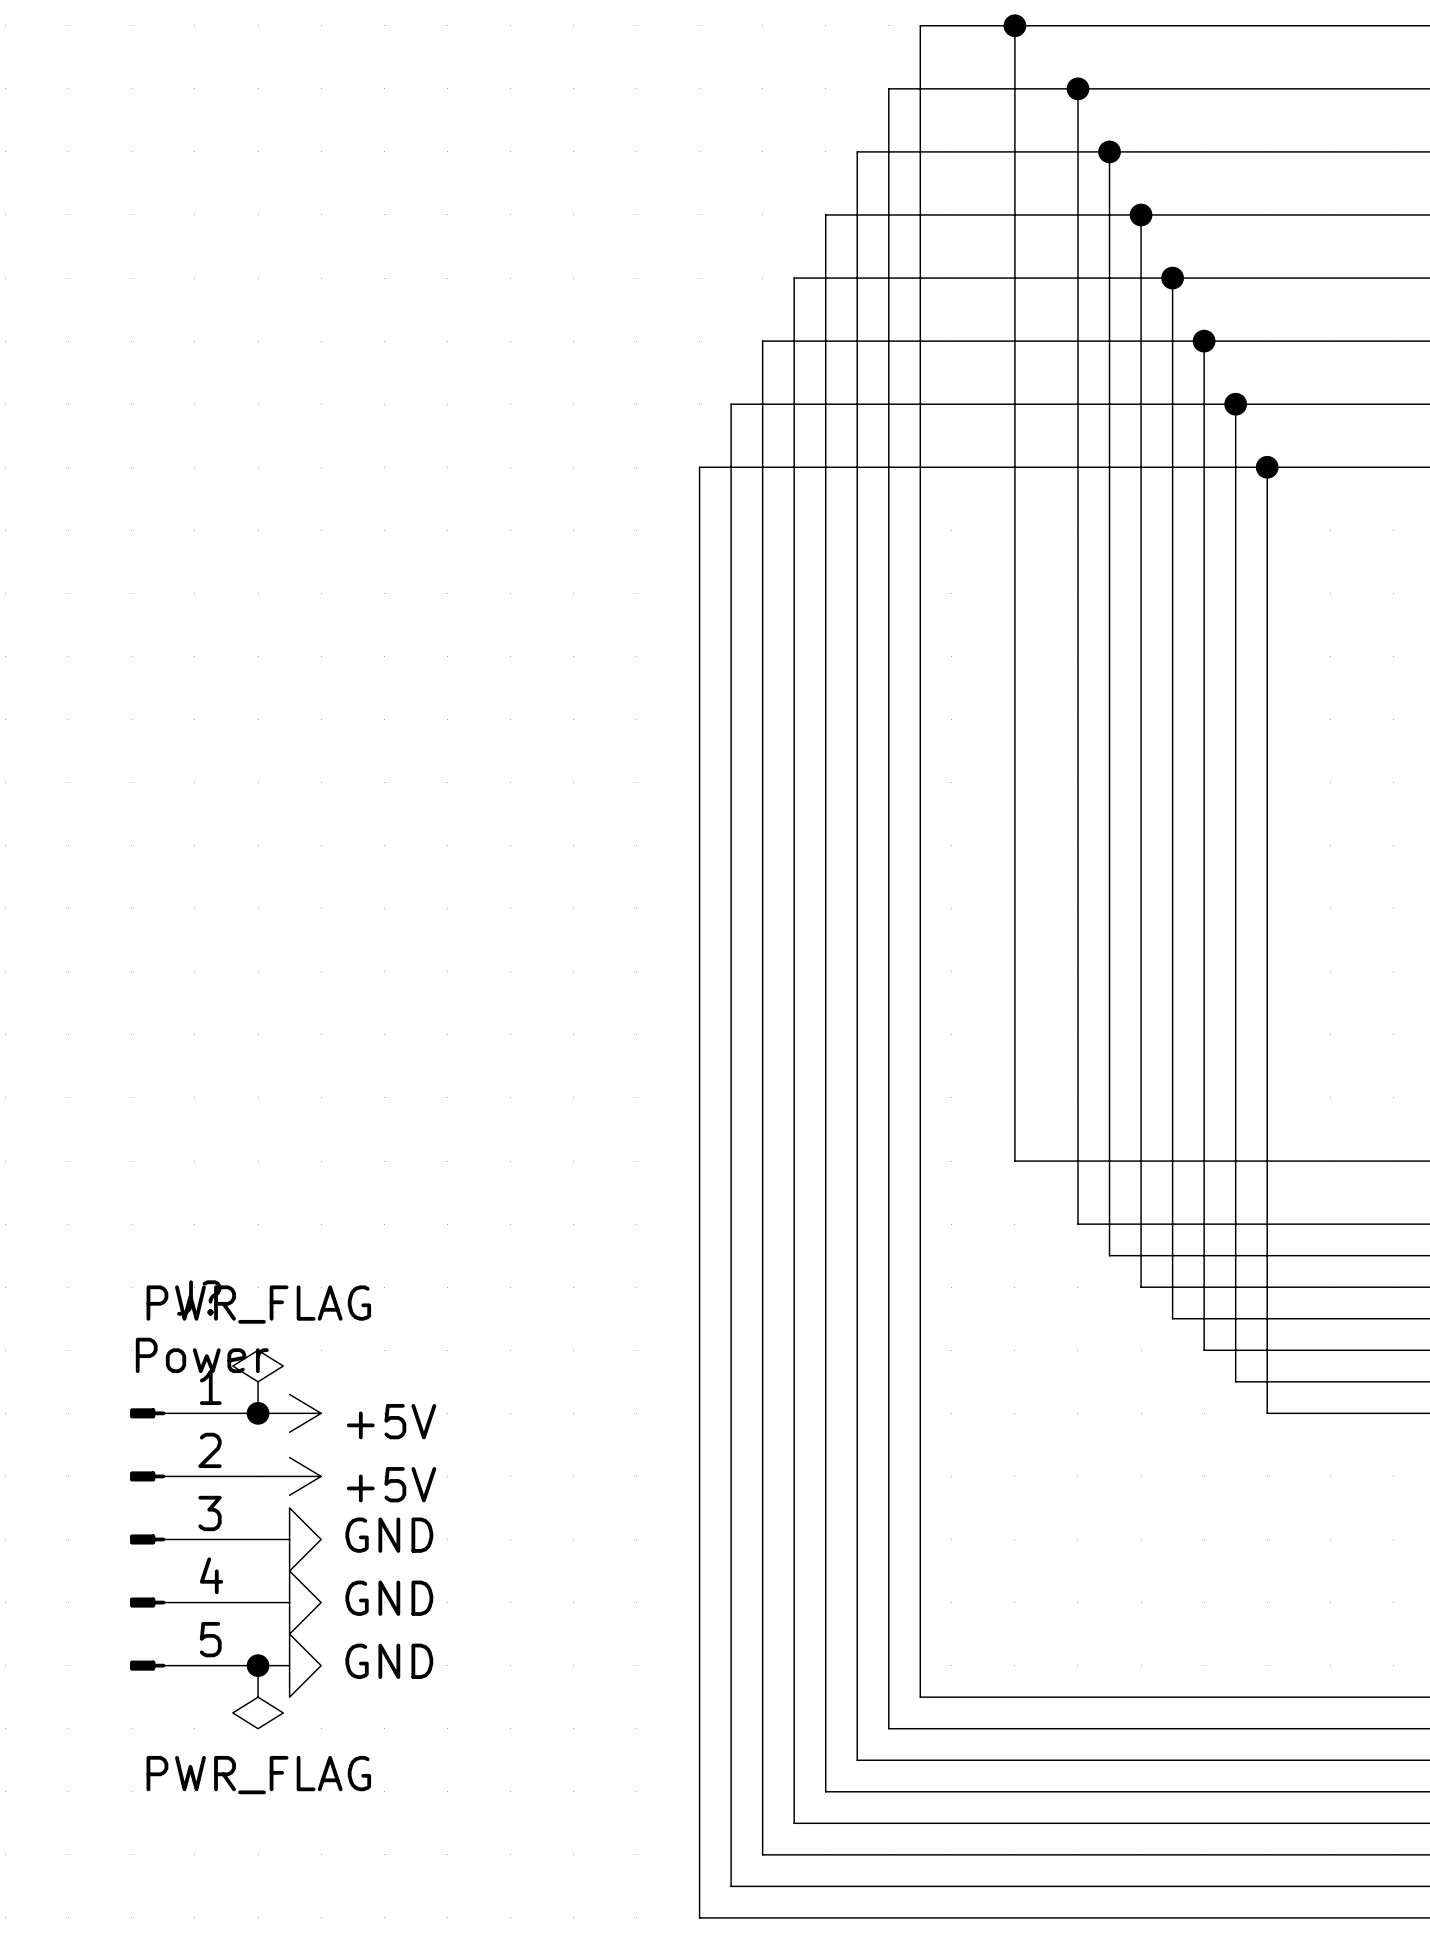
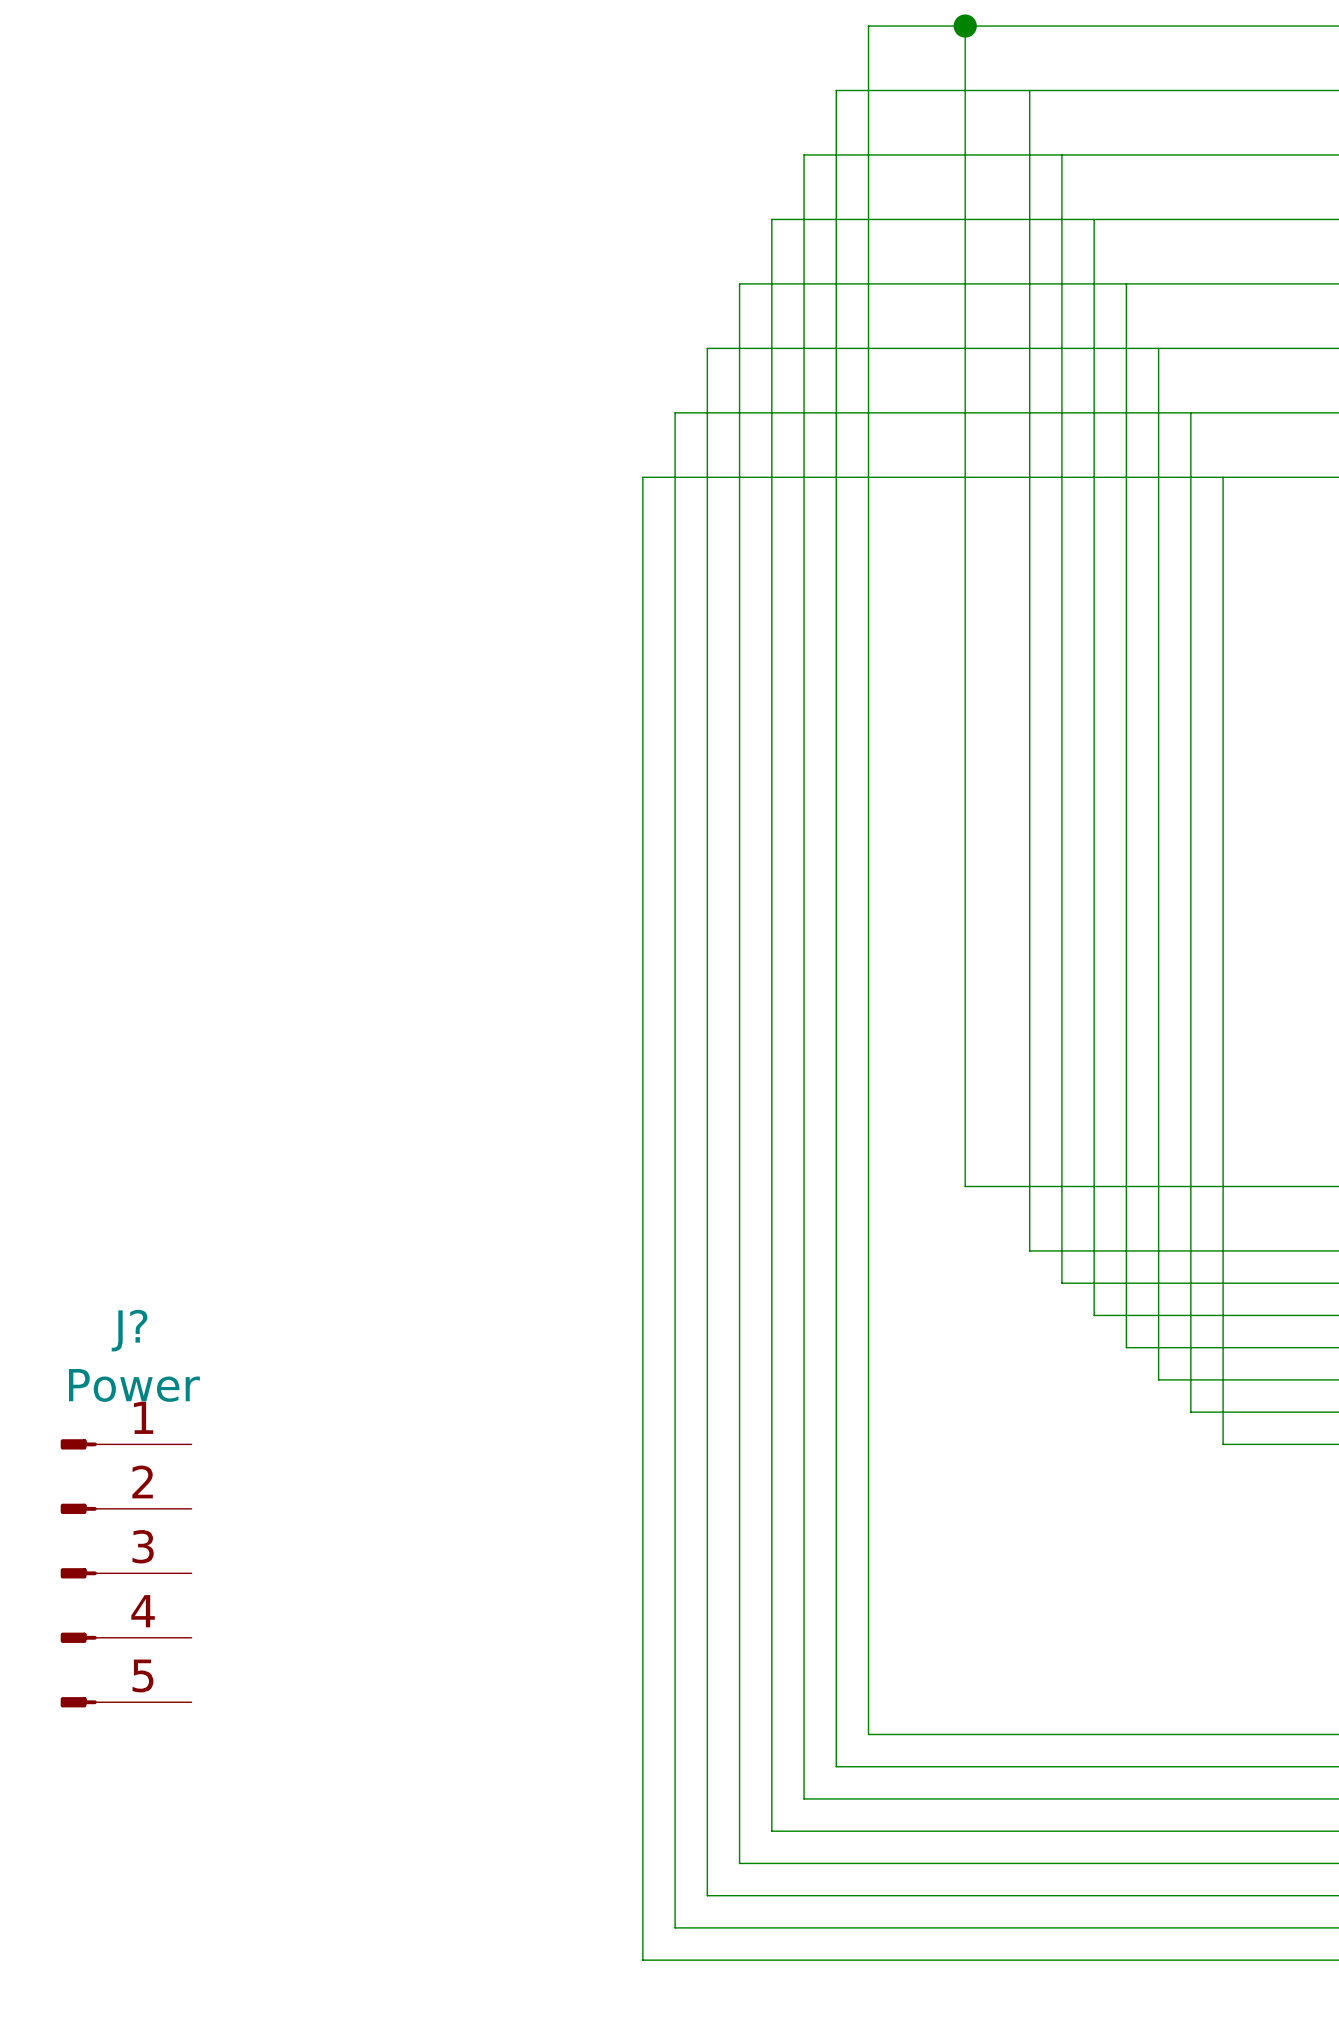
junction: (1077, 88) -> none
junction: (1109, 151) -> none
junction: (1141, 214) -> none
junction: (1172, 278) -> none
junction: (1204, 341) -> none
junction: (1235, 404) -> none
junction: (1267, 467) -> none
power symbol: PWR_FLAG (258, 1381) -> none
junction: (258, 1413) -> none
power symbol: +5V (289, 1413) -> none
power symbol: +5V (289, 1476) -> none
power symbol: GND (289, 1539) -> none
power symbol: GND (289, 1602) -> none
junction: (258, 1665) -> none
power symbol: GND (289, 1665) -> none
power symbol: PWR_FLAG (258, 1697) -> none

